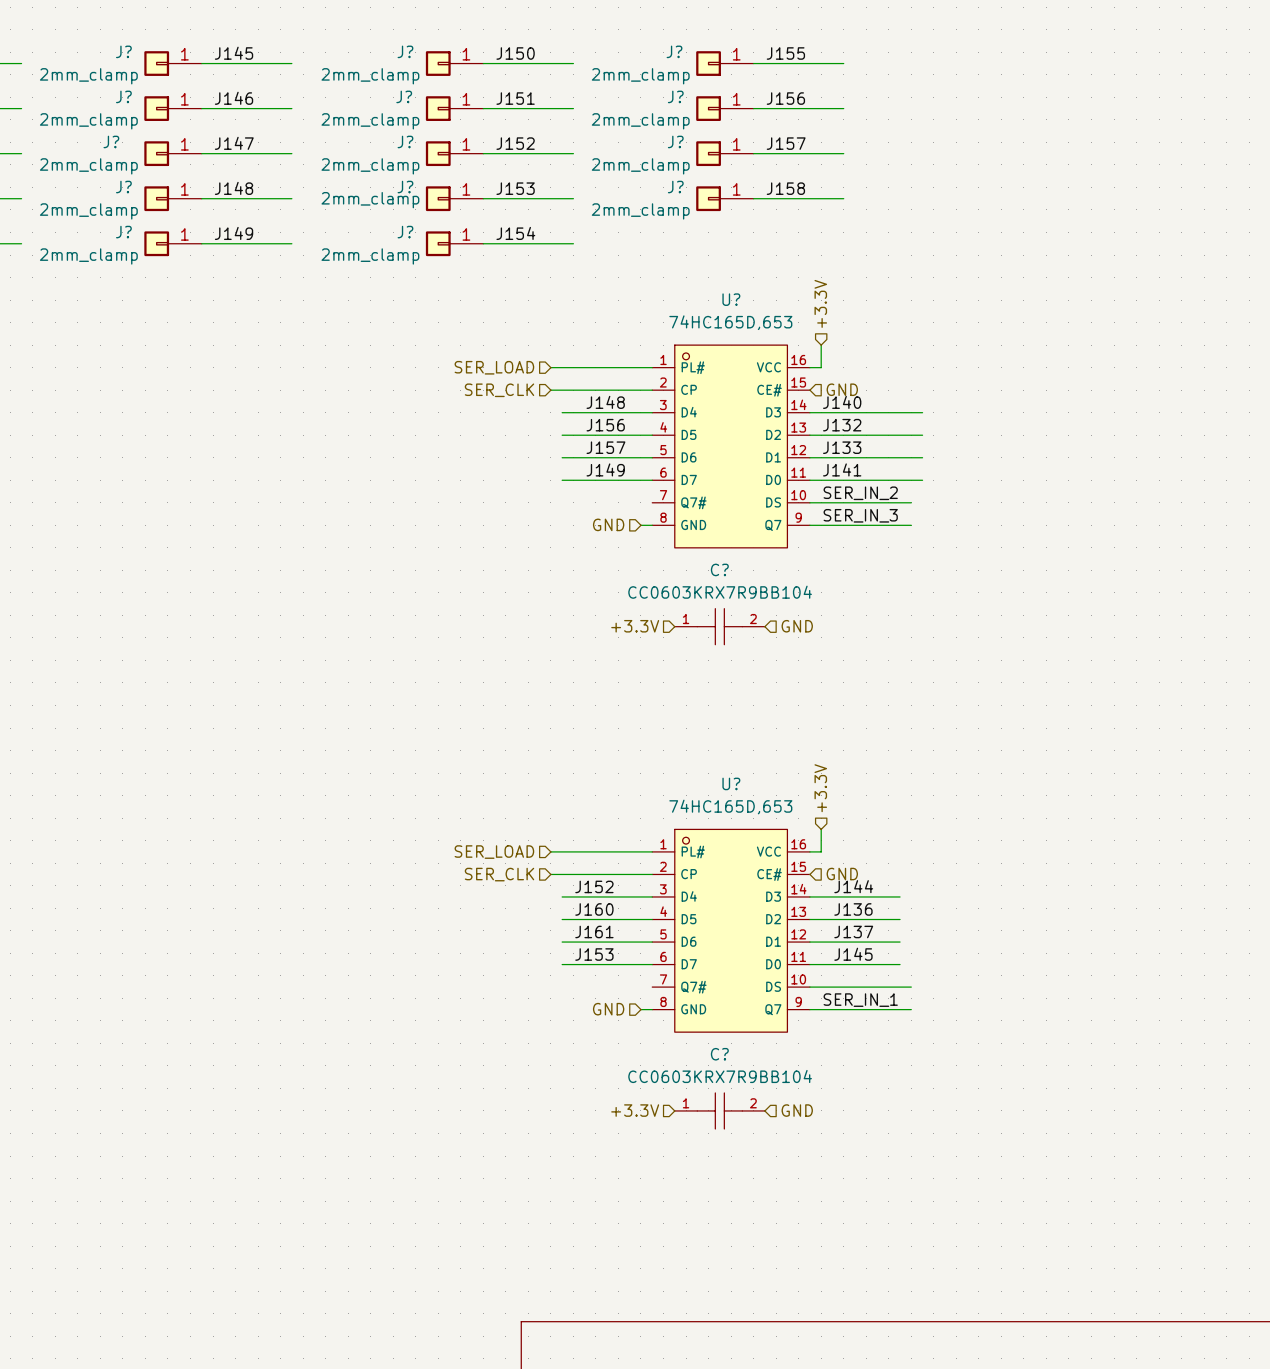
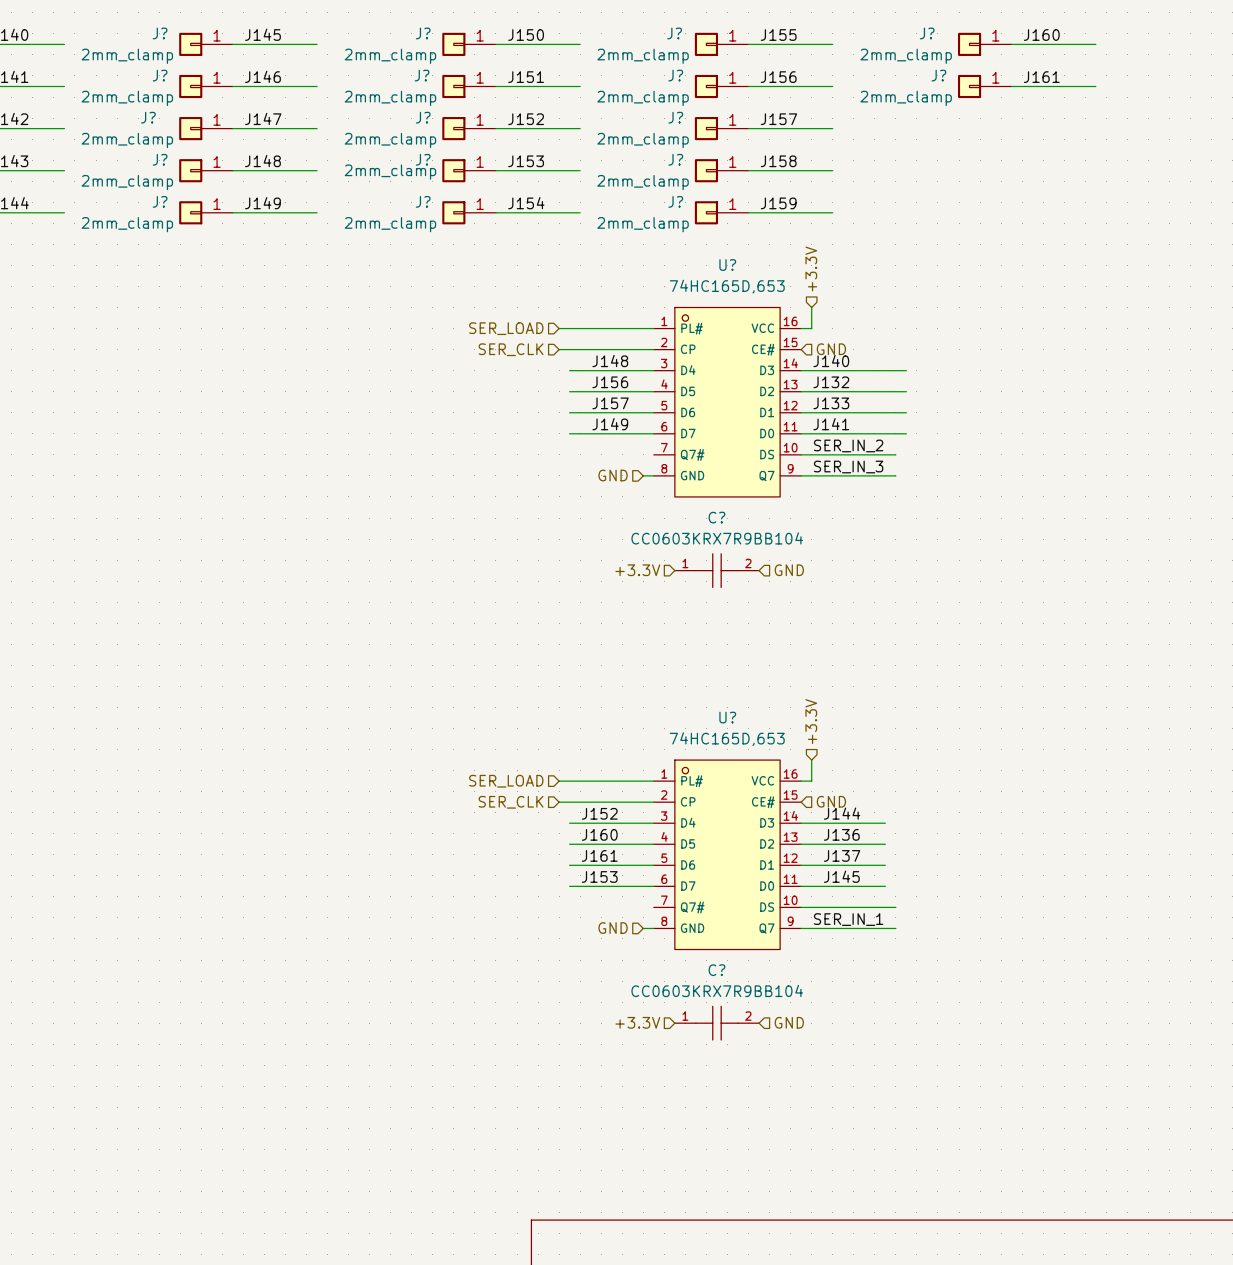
label: none -> J160 (1041, 35)
J?: none -> 2mm_clamp (984, 44)
wire: none -> (1011, 44) (1095, 44)
label: none -> J161 (1041, 77)
J?: none -> 2mm_clamp (984, 86)
wire: none -> (1011, 86) (1095, 86)
label: none -> J159 (778, 203)
J?: none -> 2mm_clamp (721, 212)
wire: none -> (748, 212) (832, 212)

